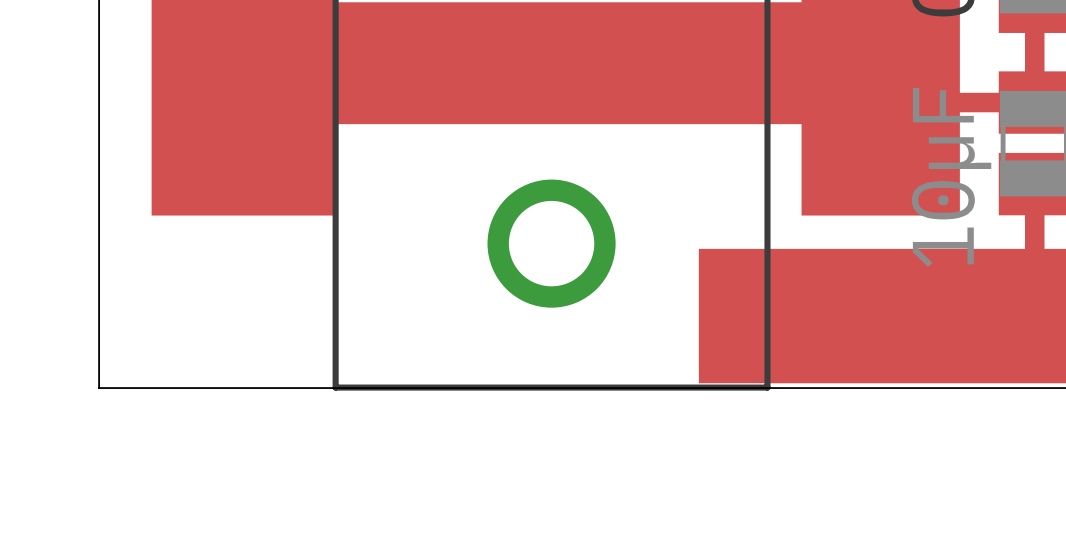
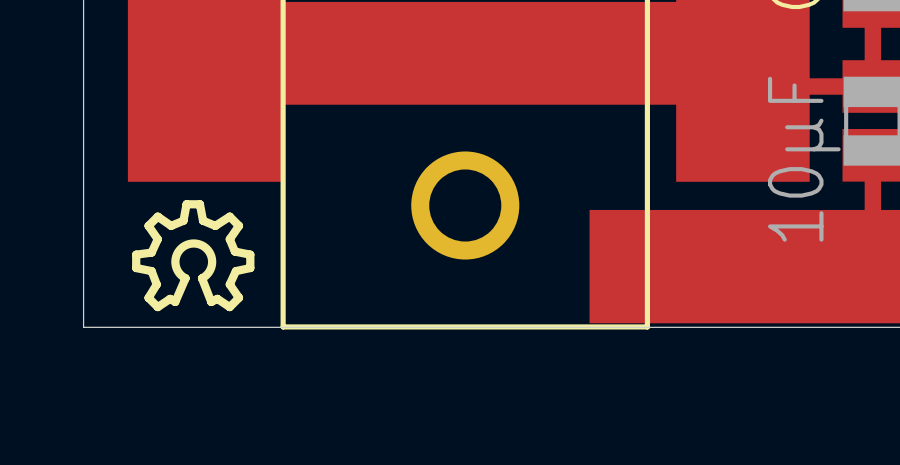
drawing: none -> [132, 200, 255, 312]

